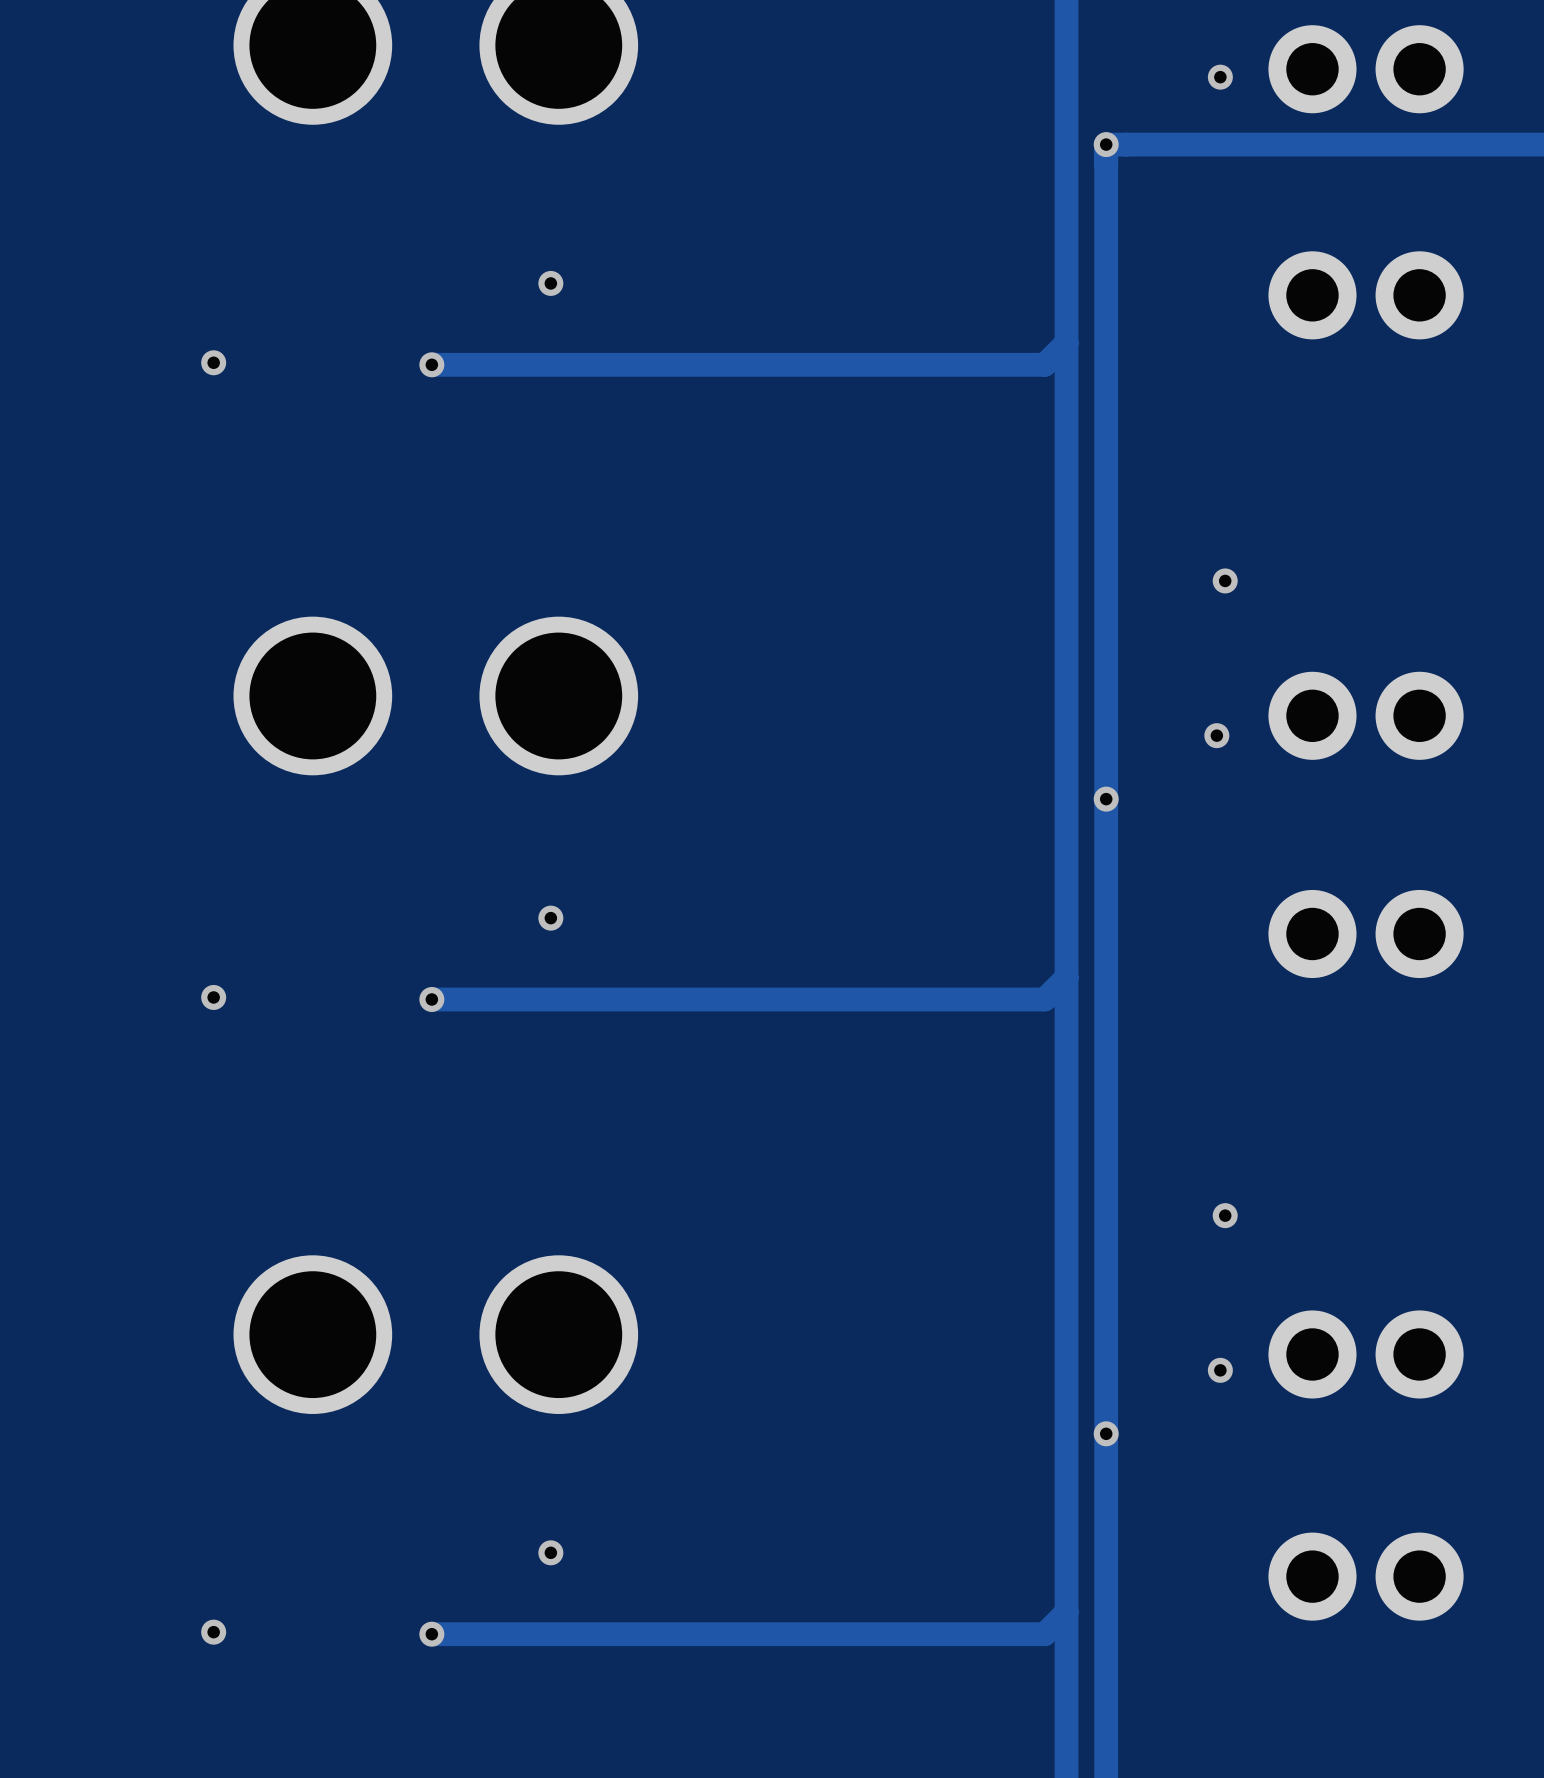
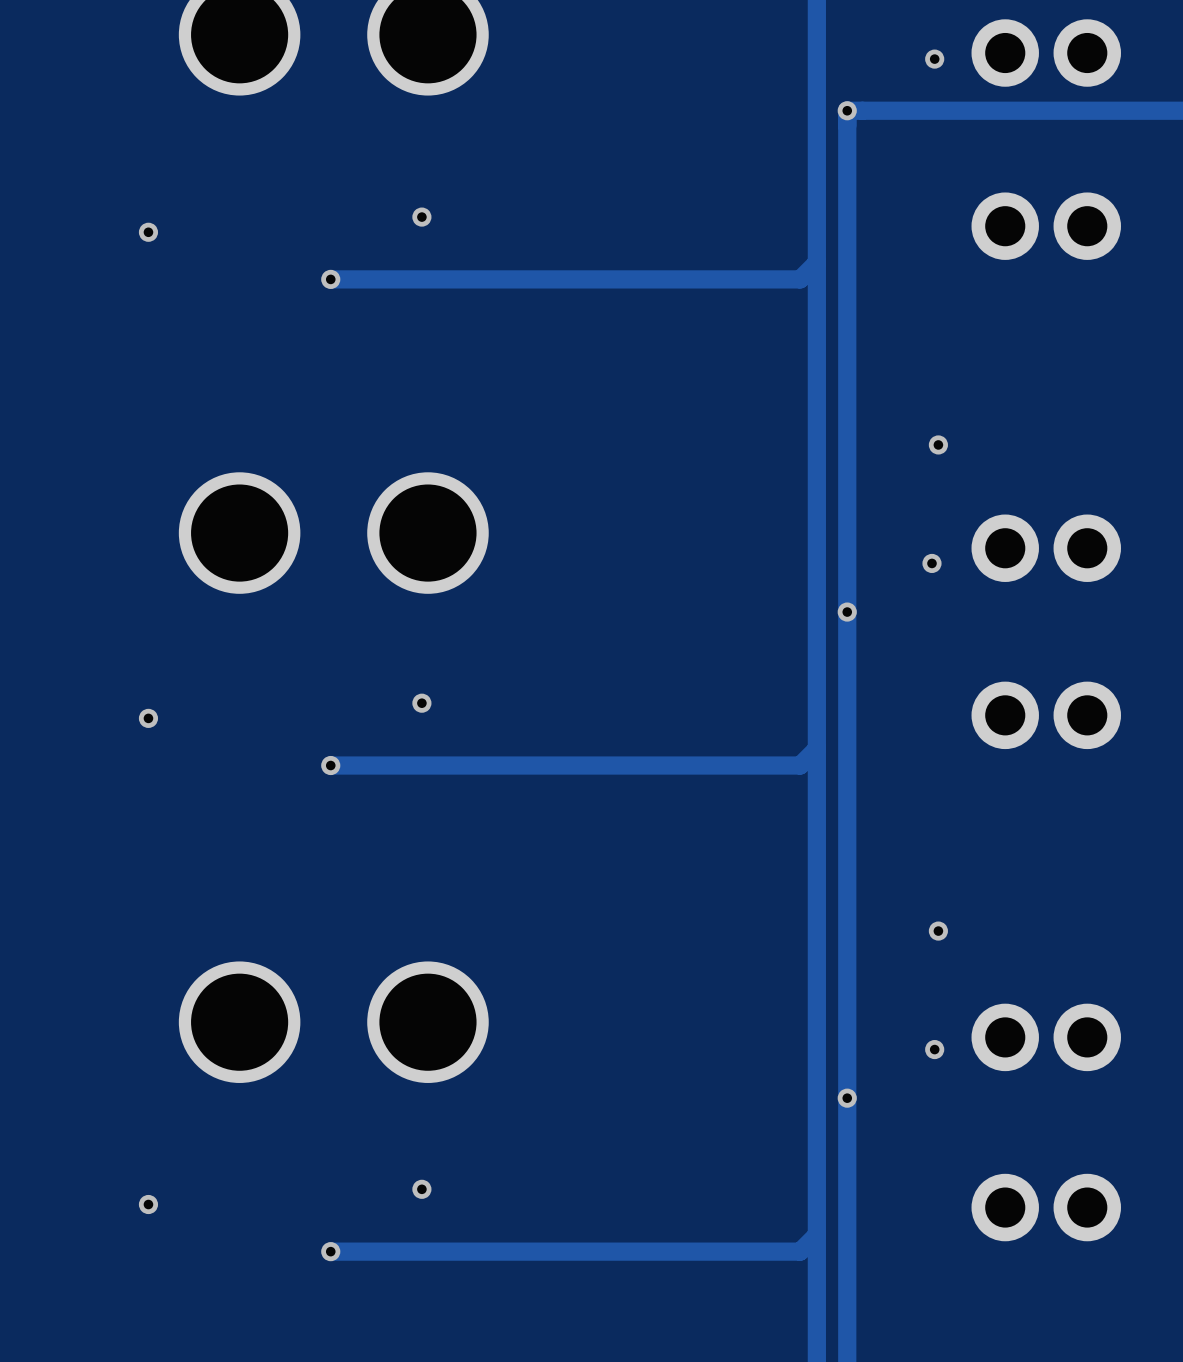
via position: (213, 362) -> (148, 232)
via position: (213, 997) -> (148, 718)
via position: (213, 1632) -> (148, 1204)

